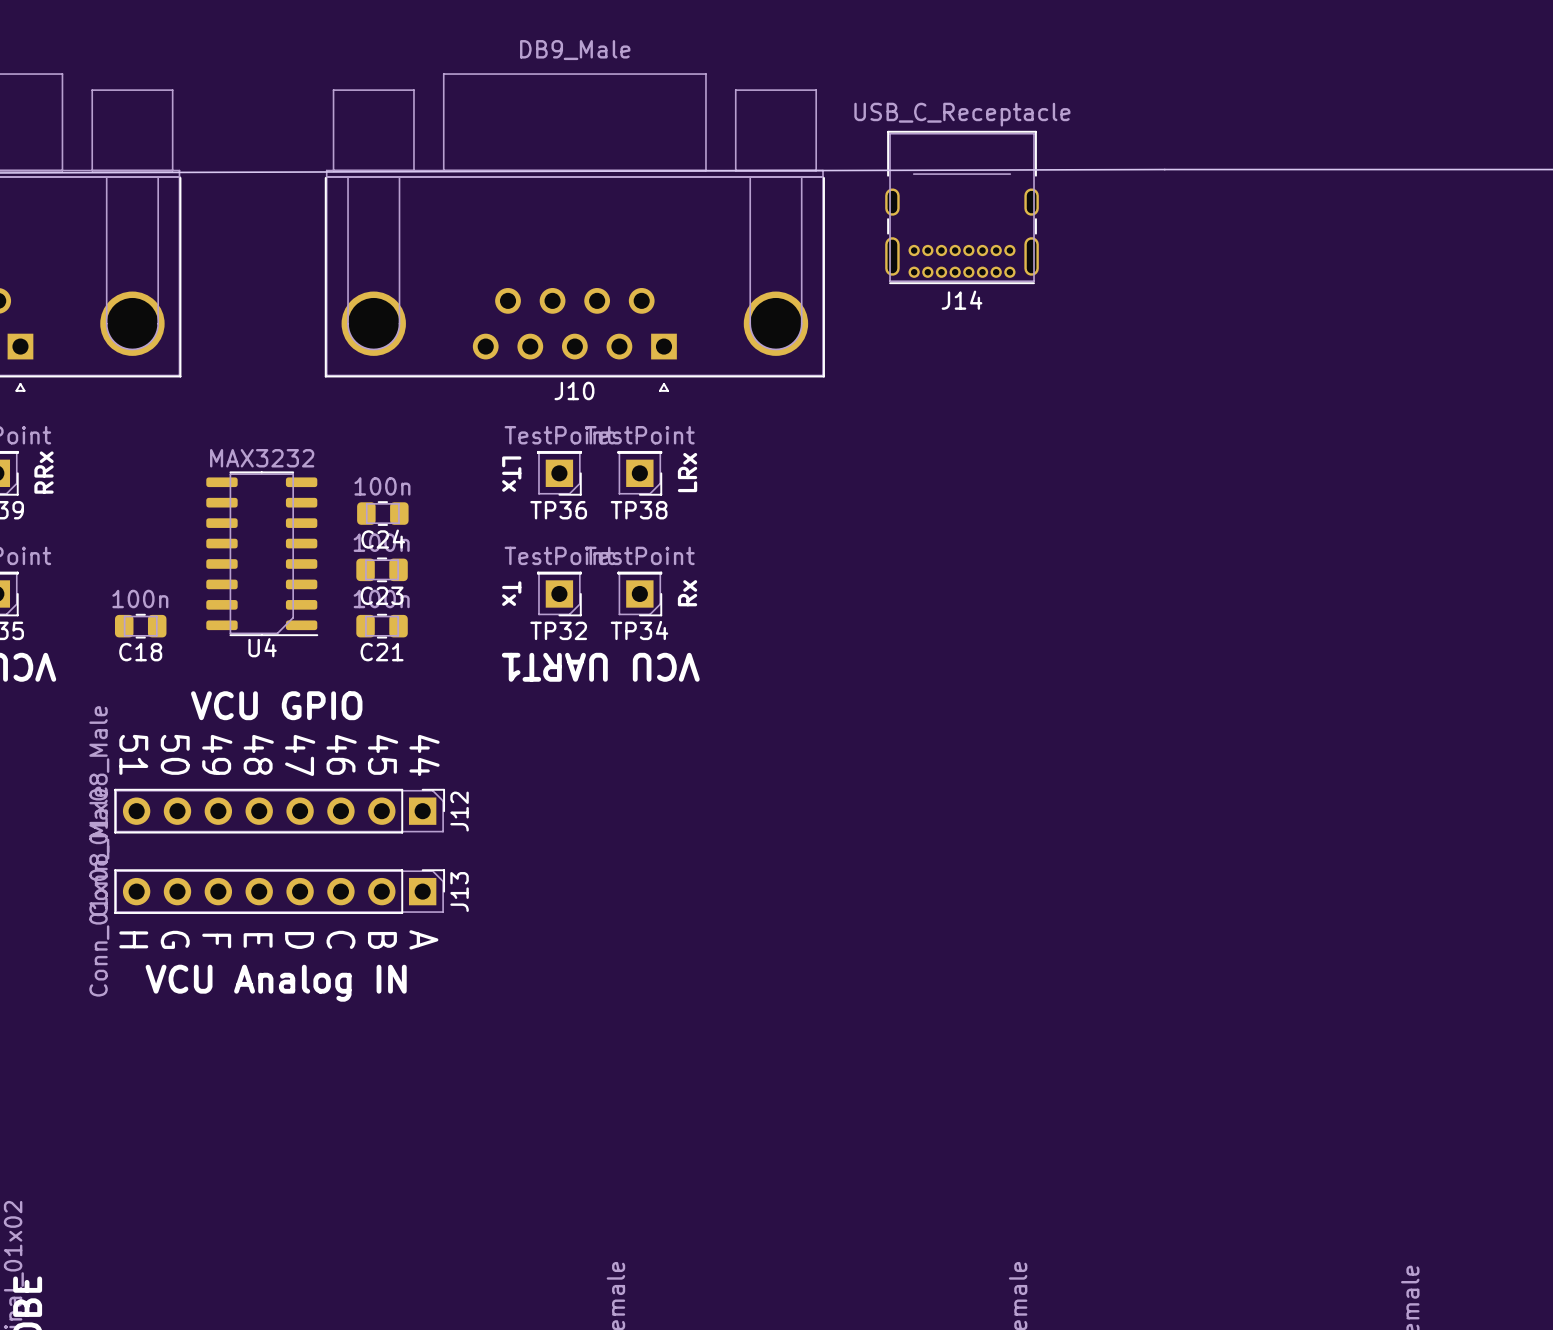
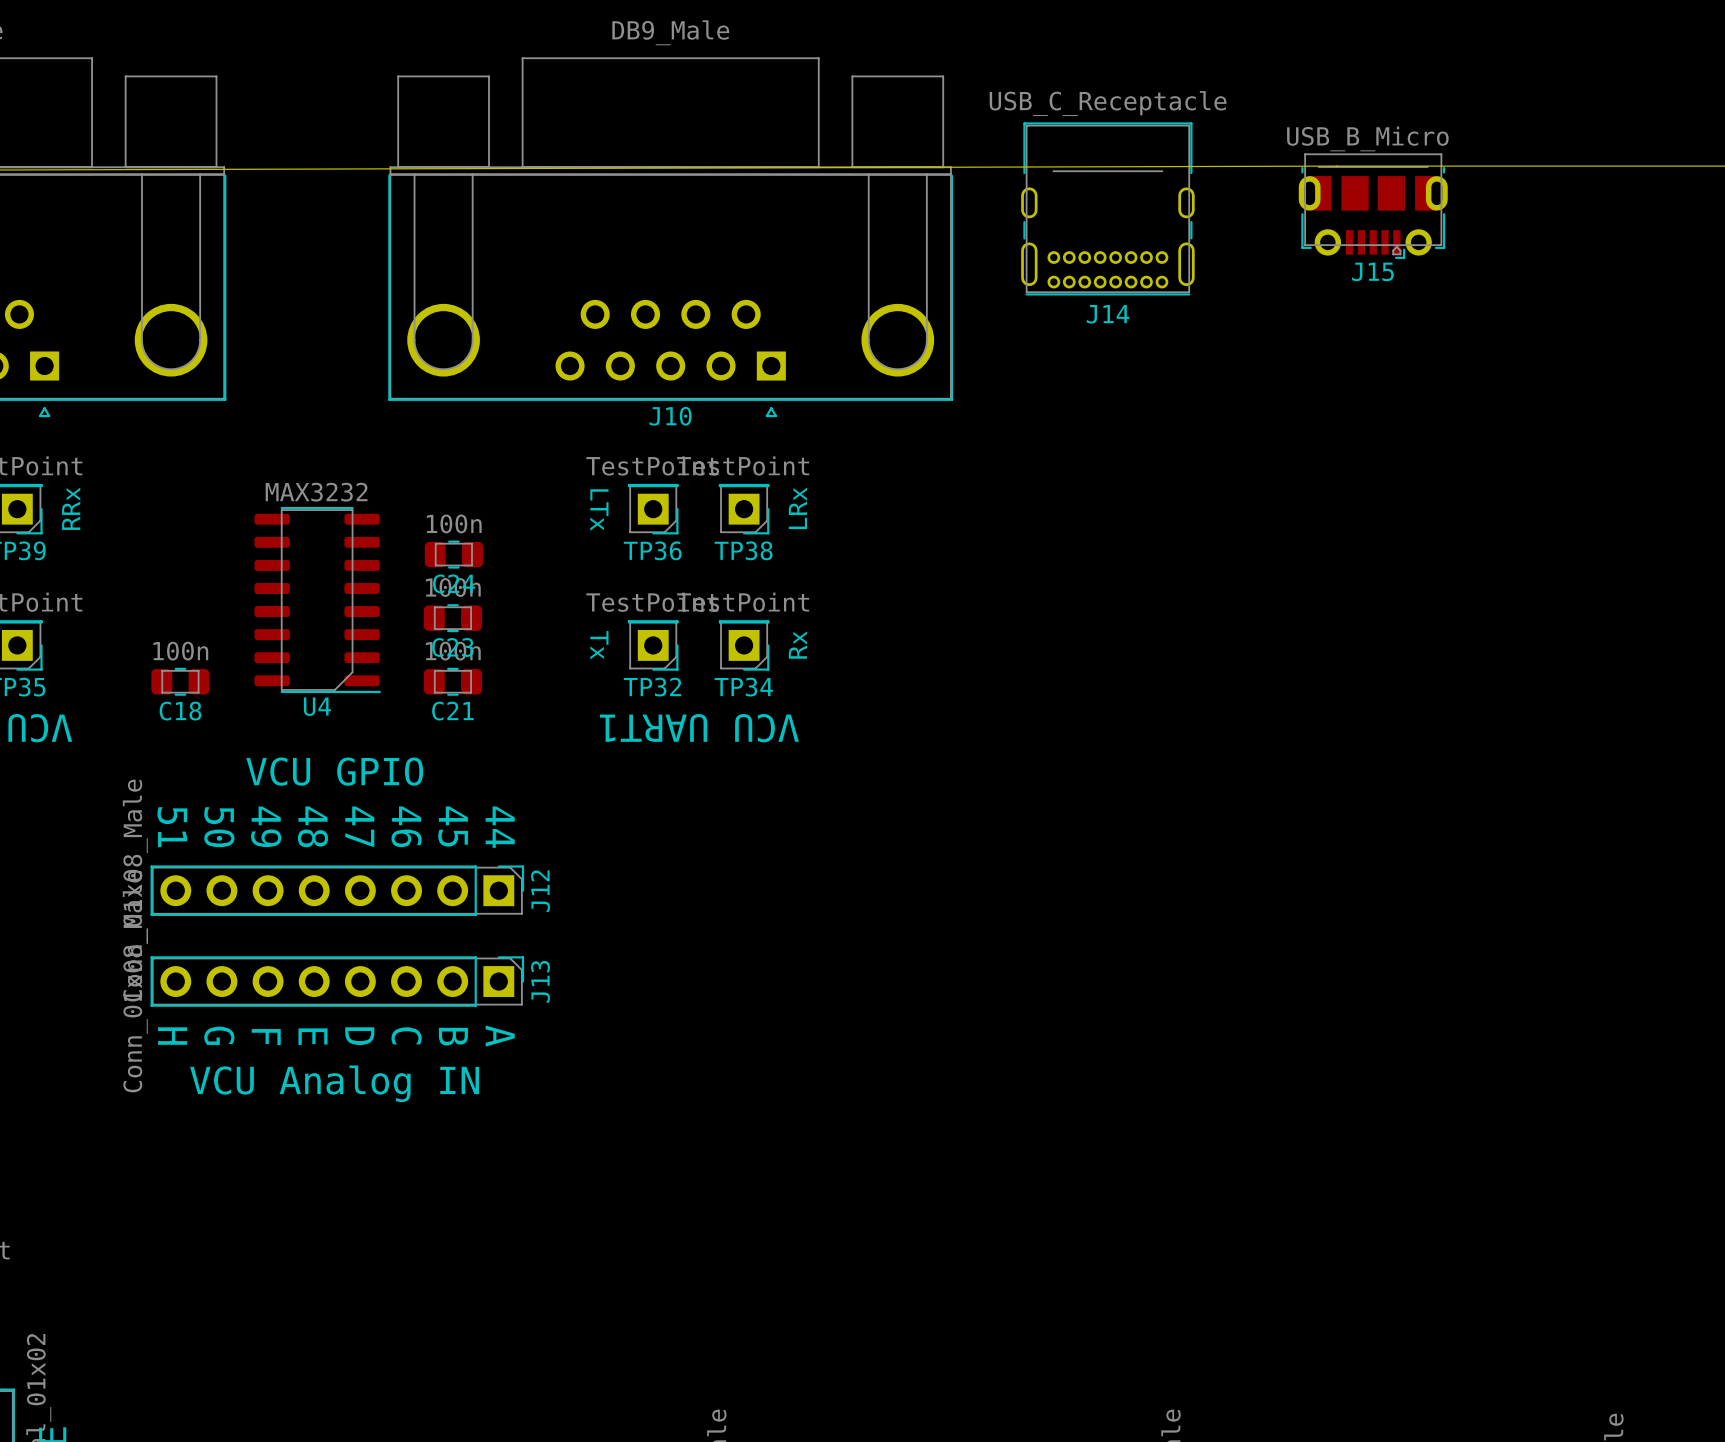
J15: none -> USB_B_Micro (1373, 206)

